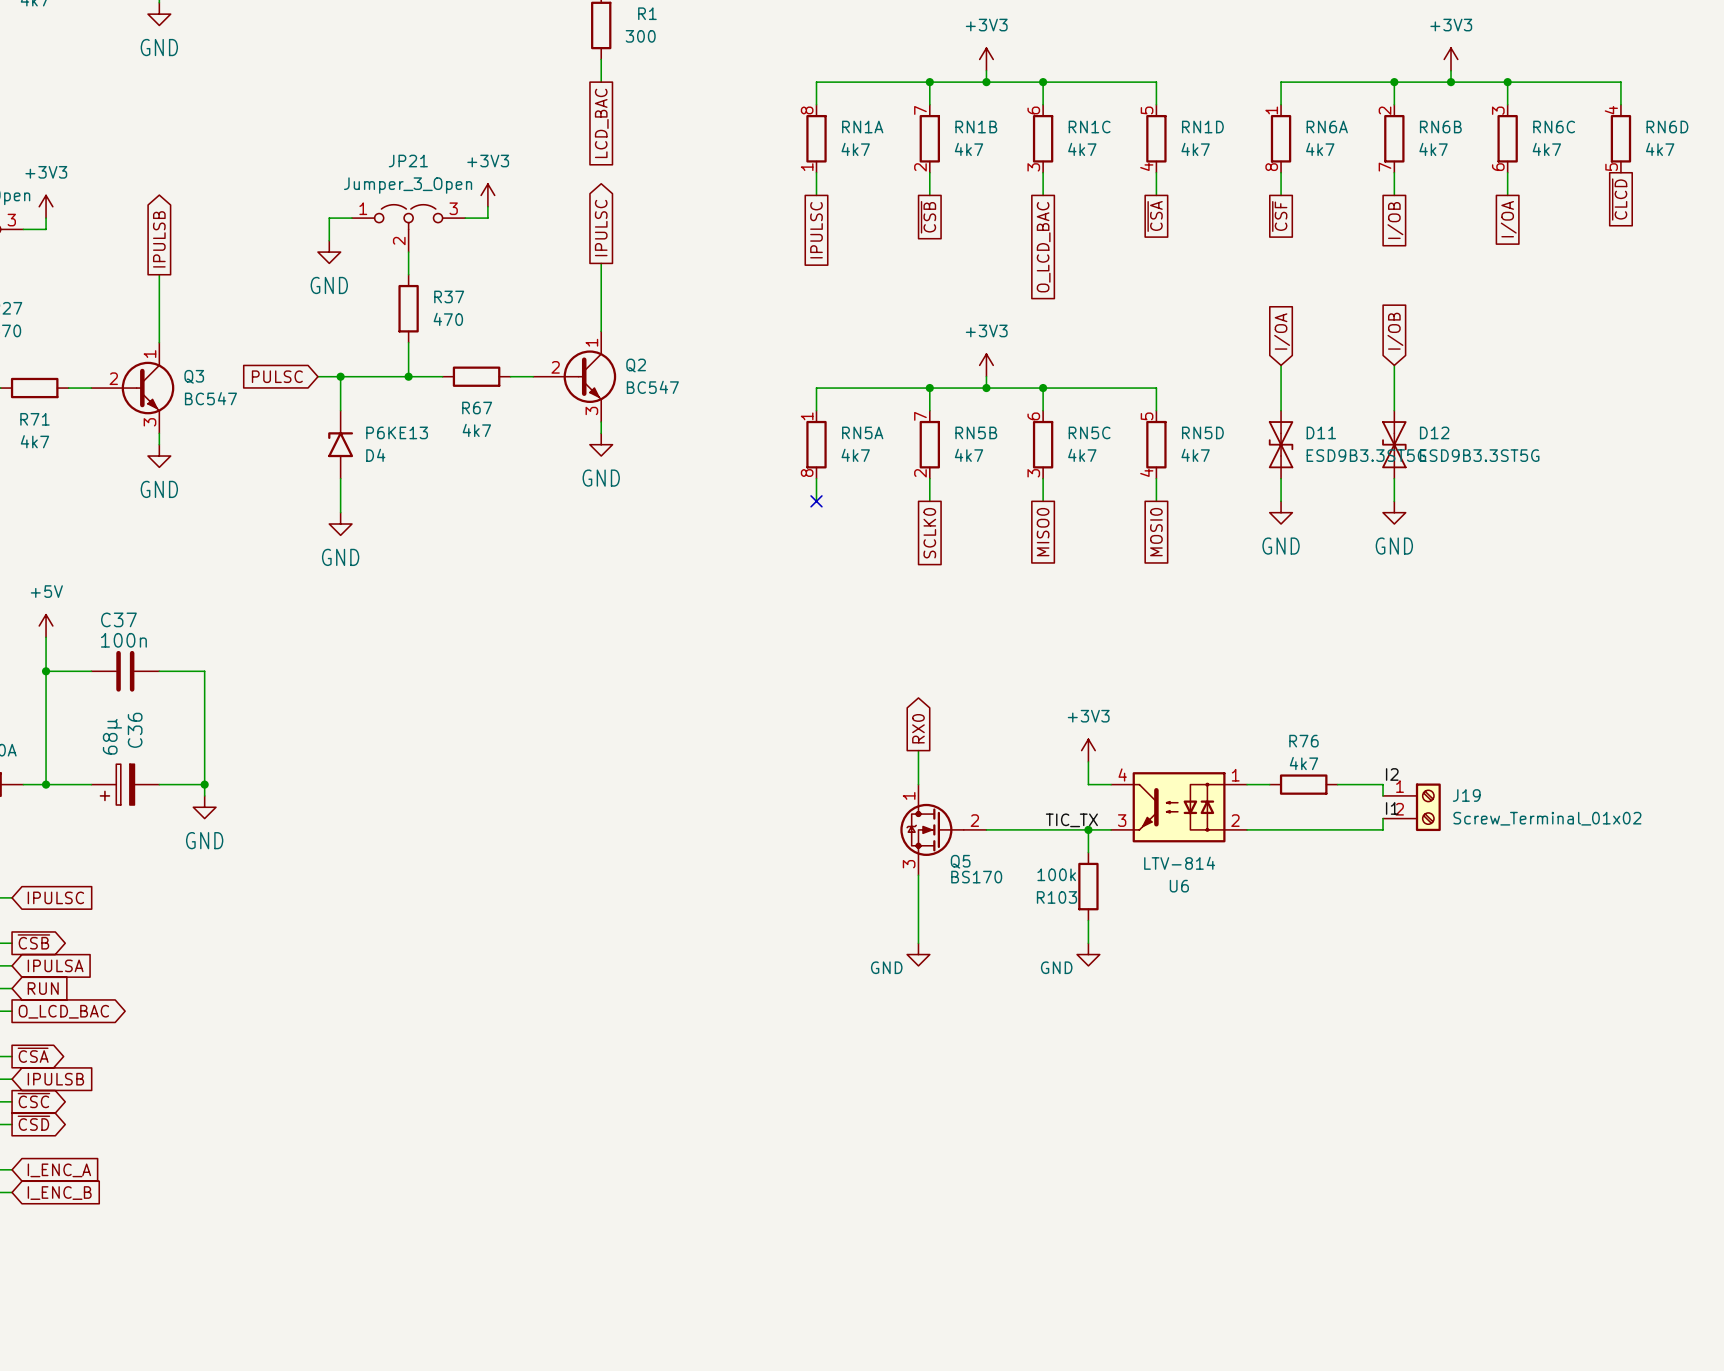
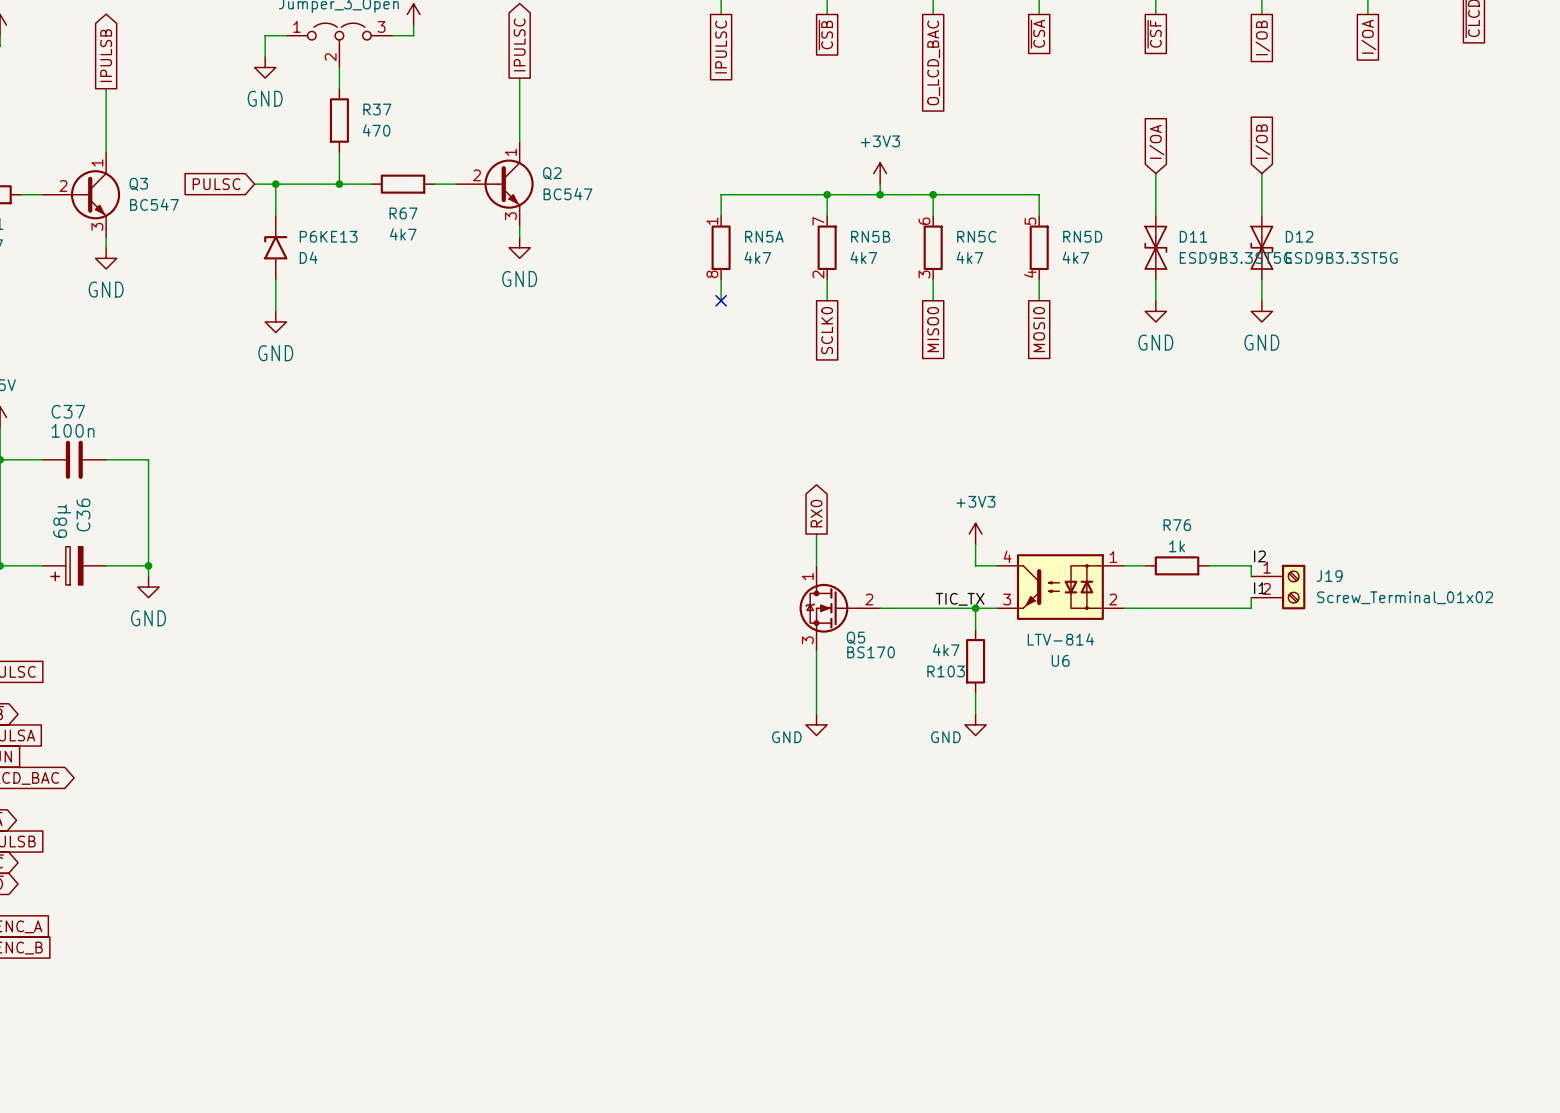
R76 value: 4k7 (1303, 763) -> 1k (1177, 546)
R103 value: 100k (1056, 874) -> 4k7 (946, 650)

